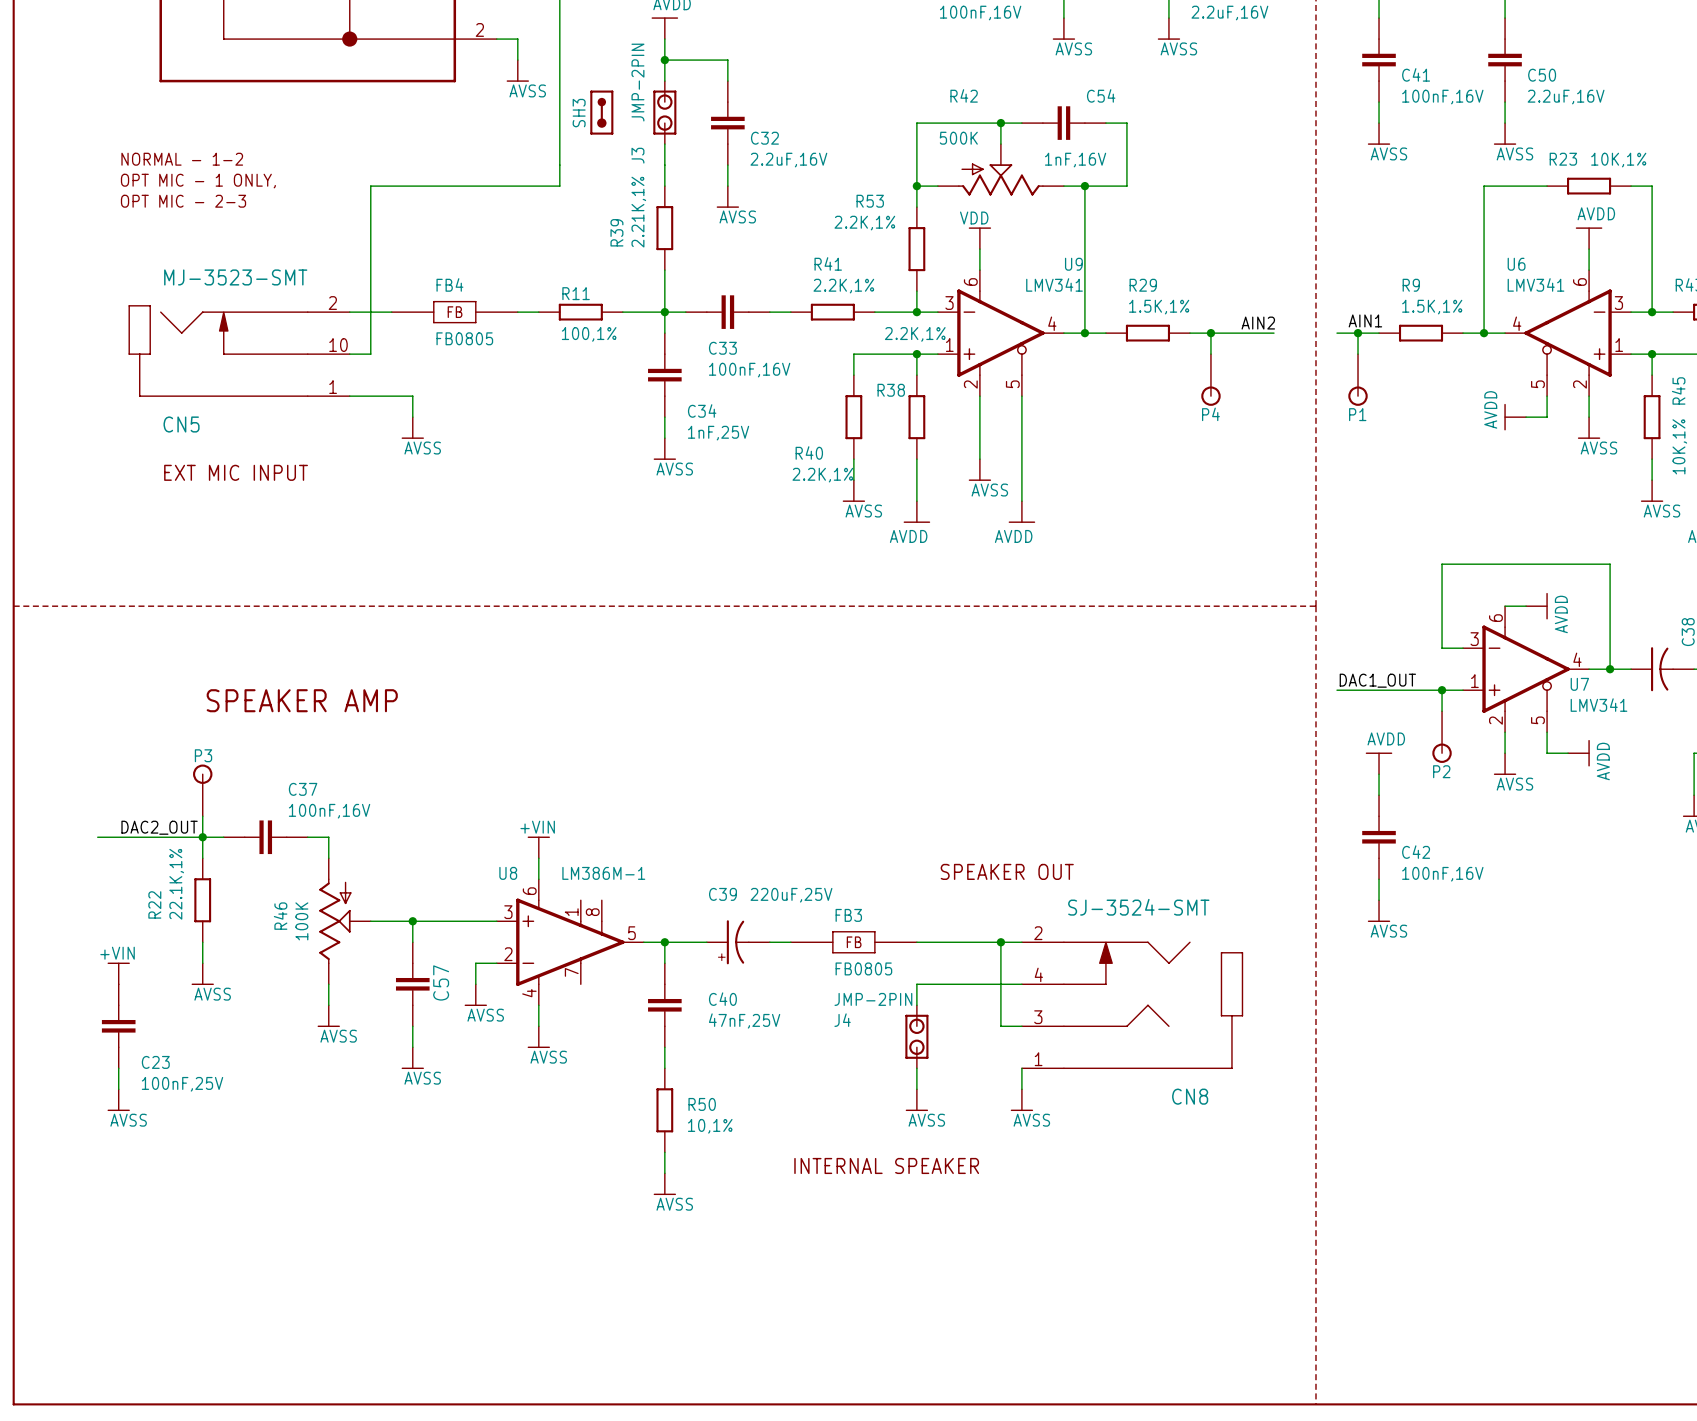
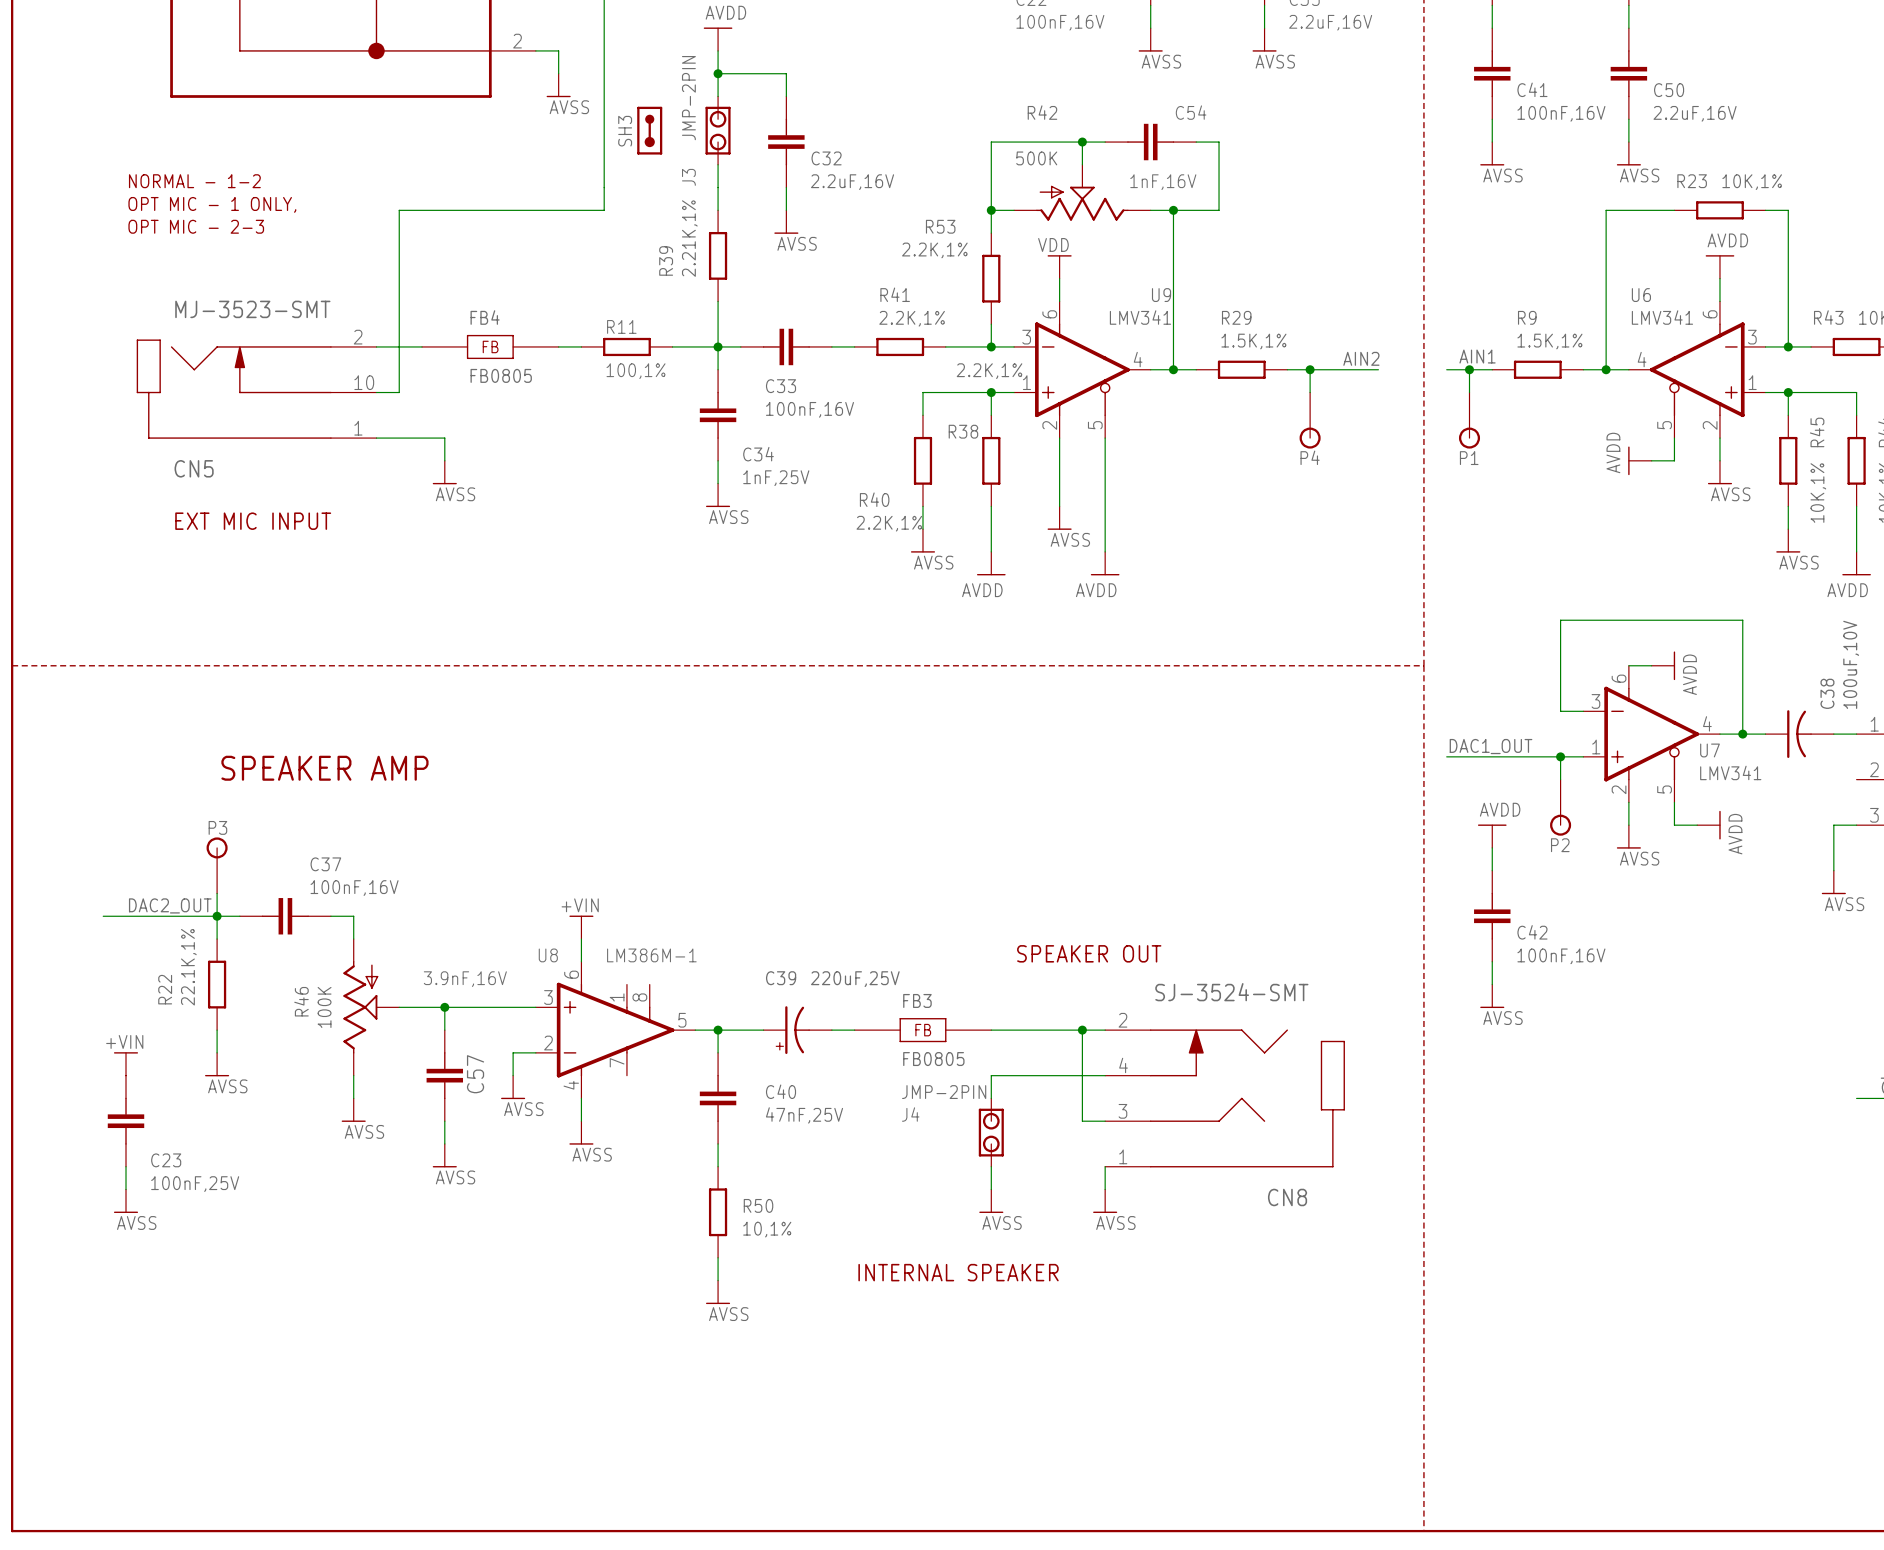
C57 value: none -> 3.9nF,16V (465, 979)

